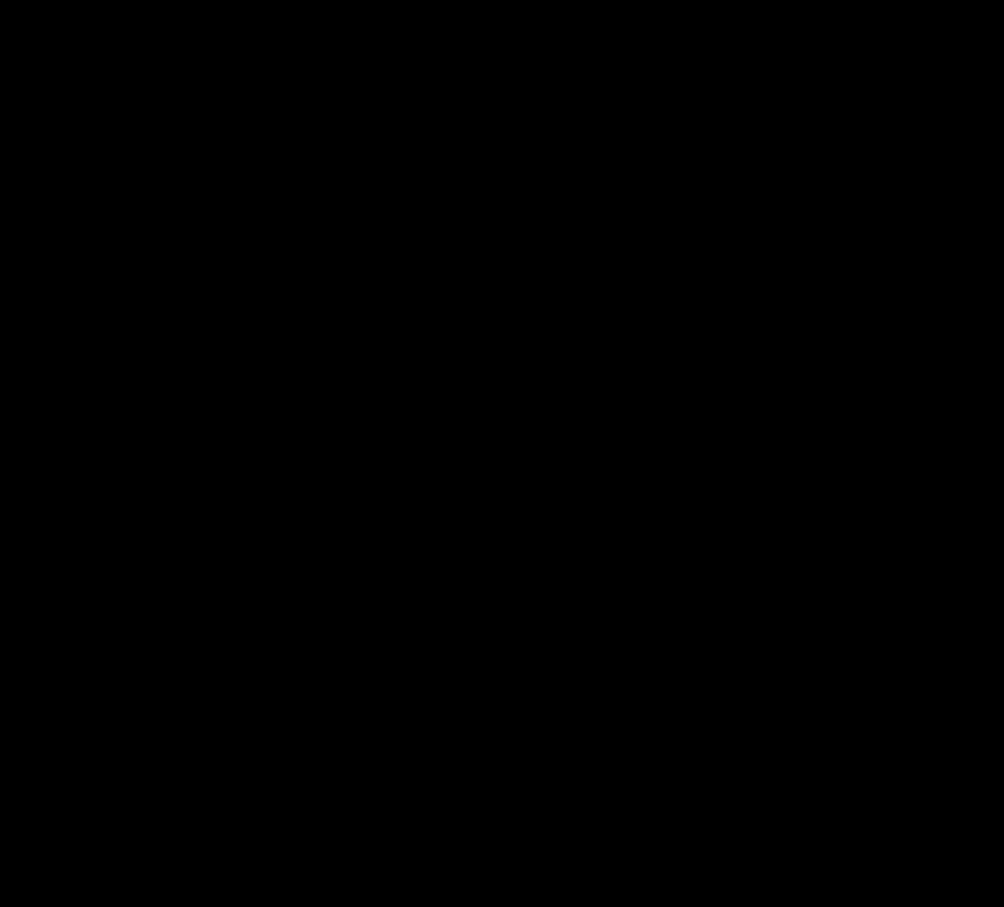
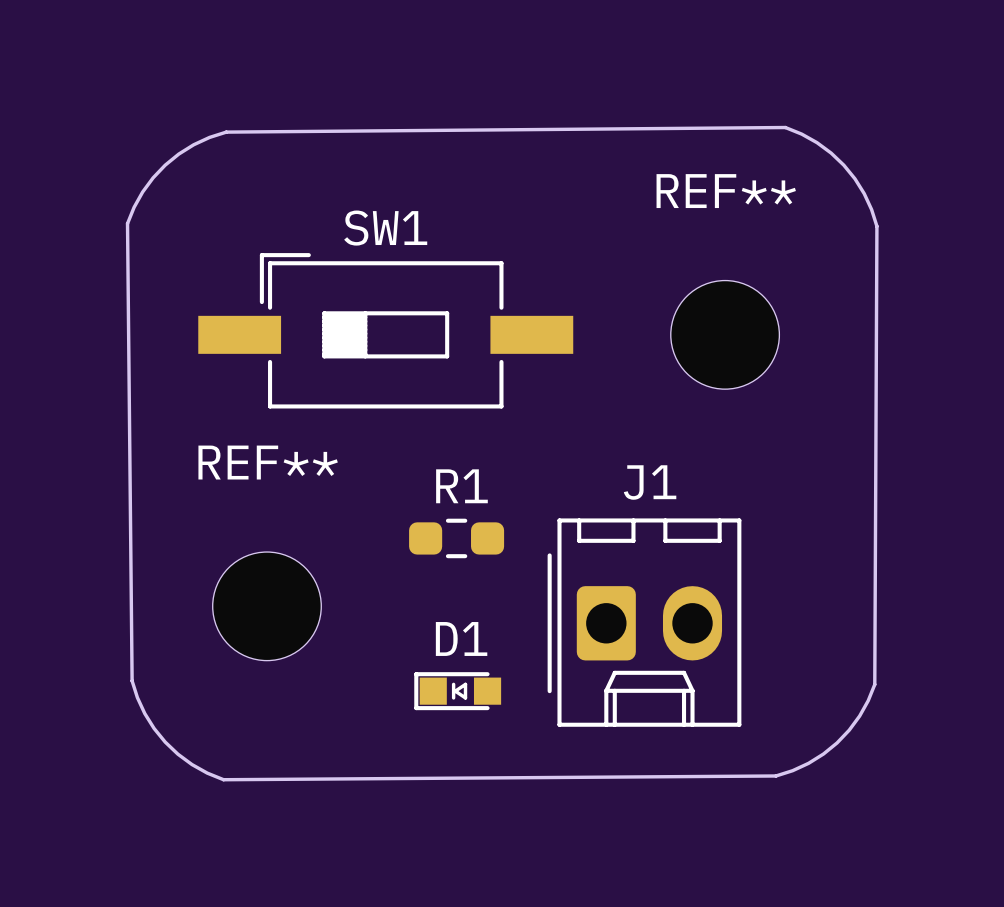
board edge: none -> (785, 127) (226, 132) (193, 144) (165, 165) (142, 192) (127, 223) (132, 680) (144, 713) (165, 742) (192, 764) (223, 779) (775, 775) (808, 763) (837, 742) (859, 716) (874, 684) (876, 226) (864, 193) (843, 165) (817, 142) (785, 127)
SW1: none -> (385, 330)
REF**: none -> (725, 334)
R1: none -> (456, 538)
REF**: none -> (266, 606)
J1: none -> (644, 622)
D1: none -> (457, 691)

